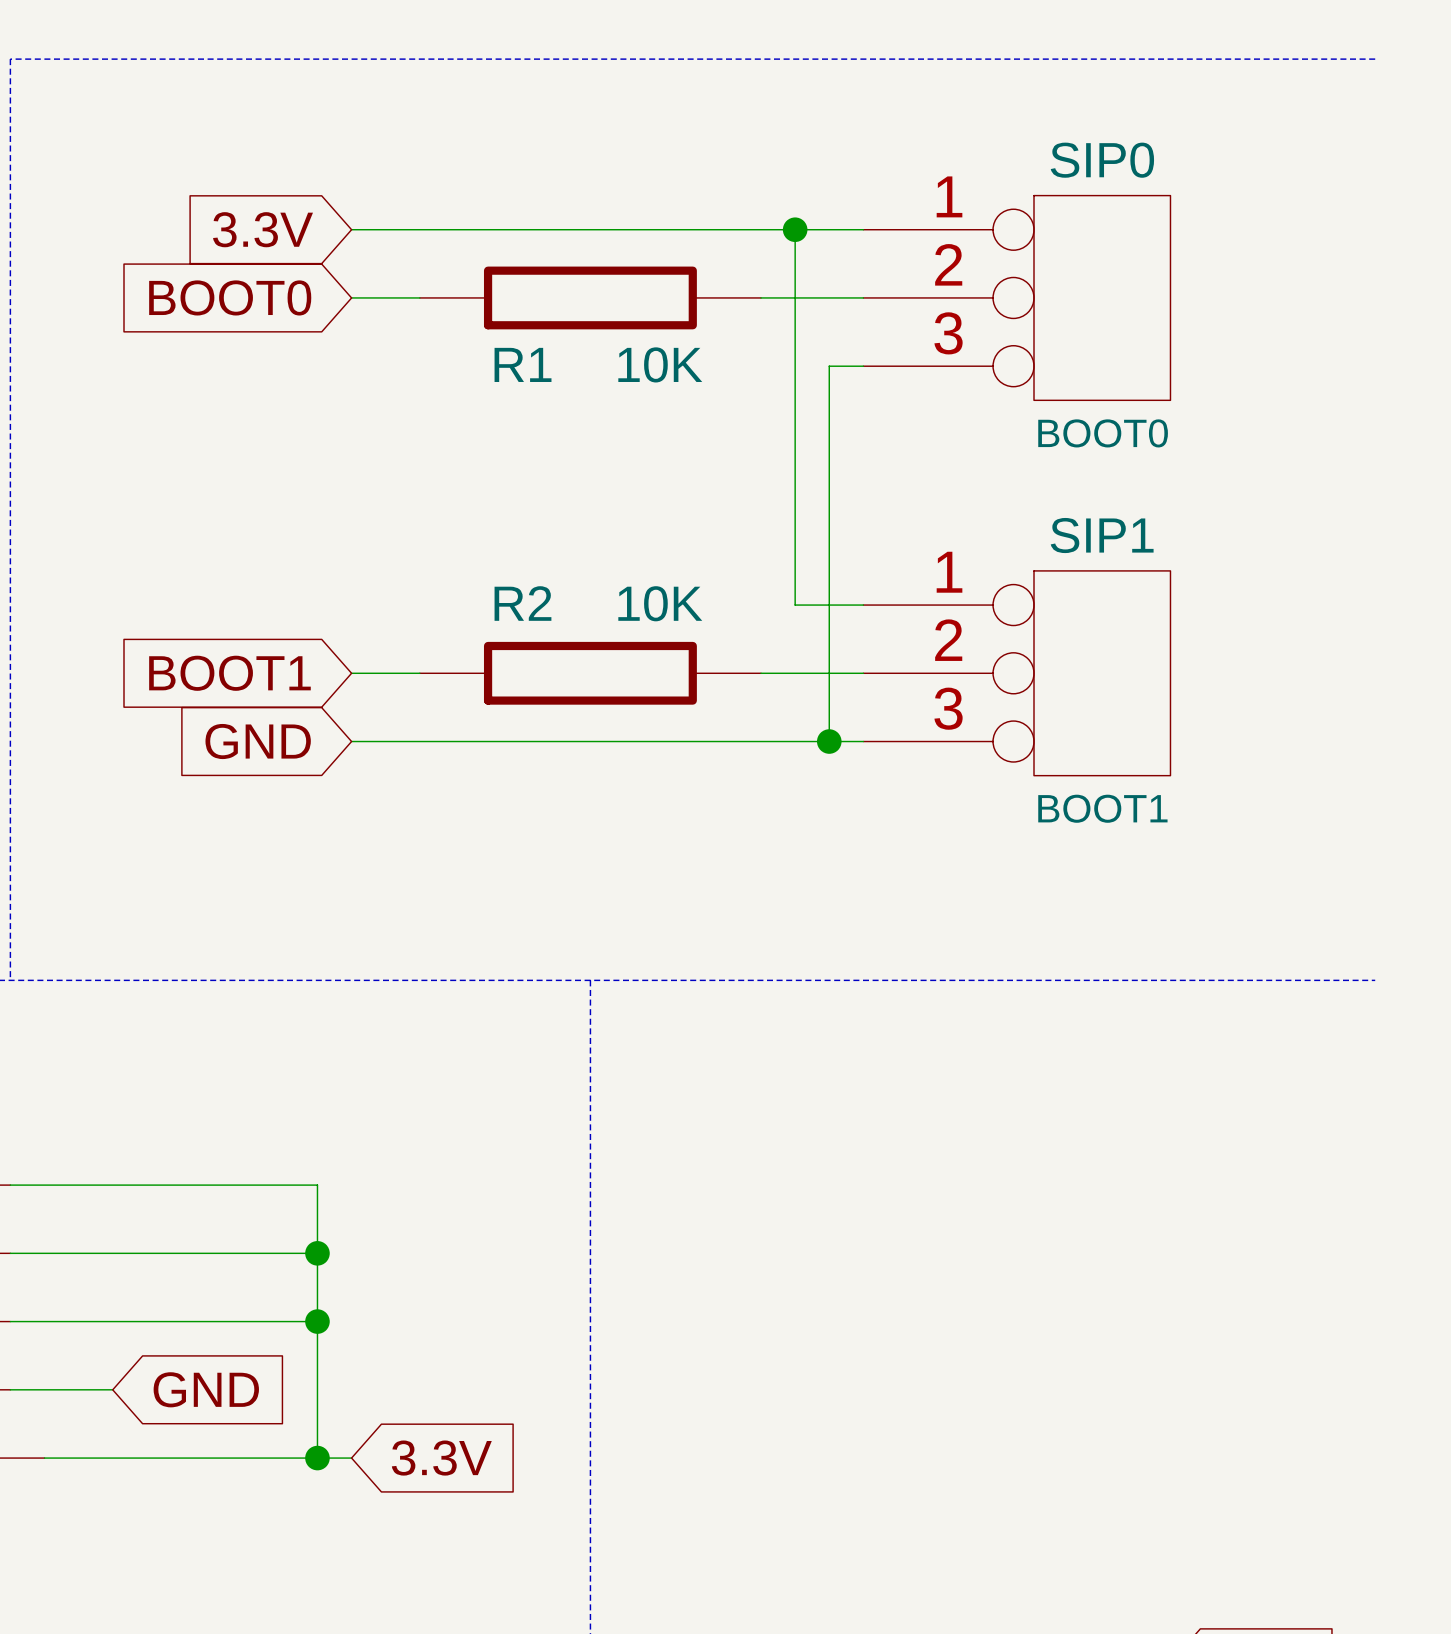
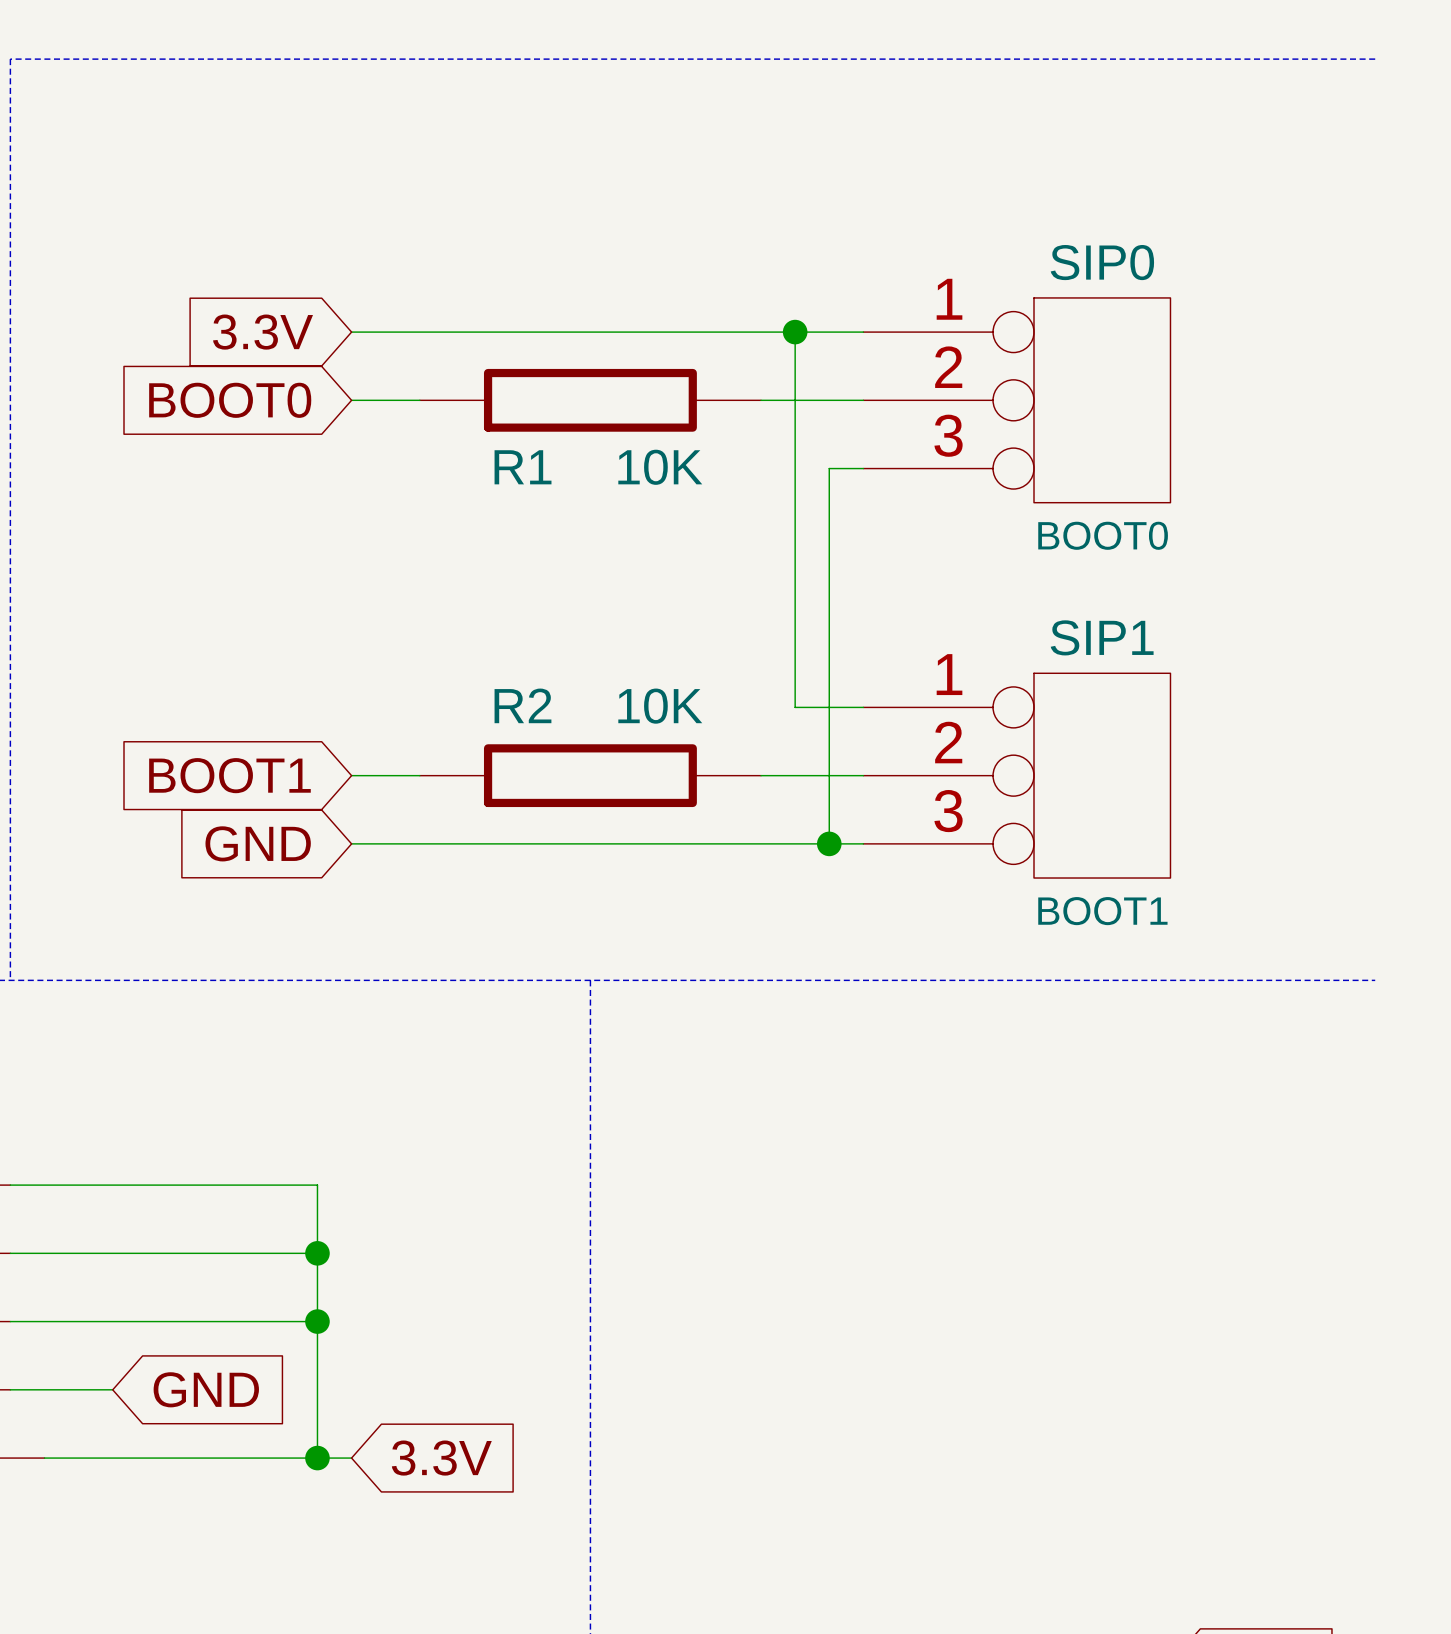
global label position: 3.3V (263, 229) -> 3.3V (263, 332)
wire: (351, 229) (863, 229) -> (351, 332) (863, 332)
wire: (795, 229) (795, 332) -> (829, 741) (829, 843)
junction position: (795, 229) -> (795, 332)
global label position: BOOT0 (230, 297) -> BOOT0 (230, 400)
wire: (351, 297) (419, 297) -> (351, 400) (419, 400)
R1 position: (590, 297) -> (590, 400)
wire: (761, 297) (863, 297) -> (761, 400) (863, 400)
SIP0 position: (1016, 297) -> (1016, 400)
wire: (863, 366) (829, 366) (829, 468) -> (863, 468) (829, 468)
wire: (795, 605) (863, 605) -> (795, 605) (795, 707) (863, 707)
global label position: BOOT1 (229, 673) -> BOOT1 (229, 775)
wire: (351, 673) (419, 673) -> (351, 775) (419, 775)
R2 position: (590, 673) -> (590, 775)
wire: (761, 673) (863, 673) -> (761, 775) (863, 775)
SIP1 position: (1016, 673) -> (1016, 775)
global label position: GND (258, 741) -> GND (258, 843)
wire: (351, 741) (863, 741) -> (351, 843) (863, 843)
junction position: (829, 741) -> (829, 843)

